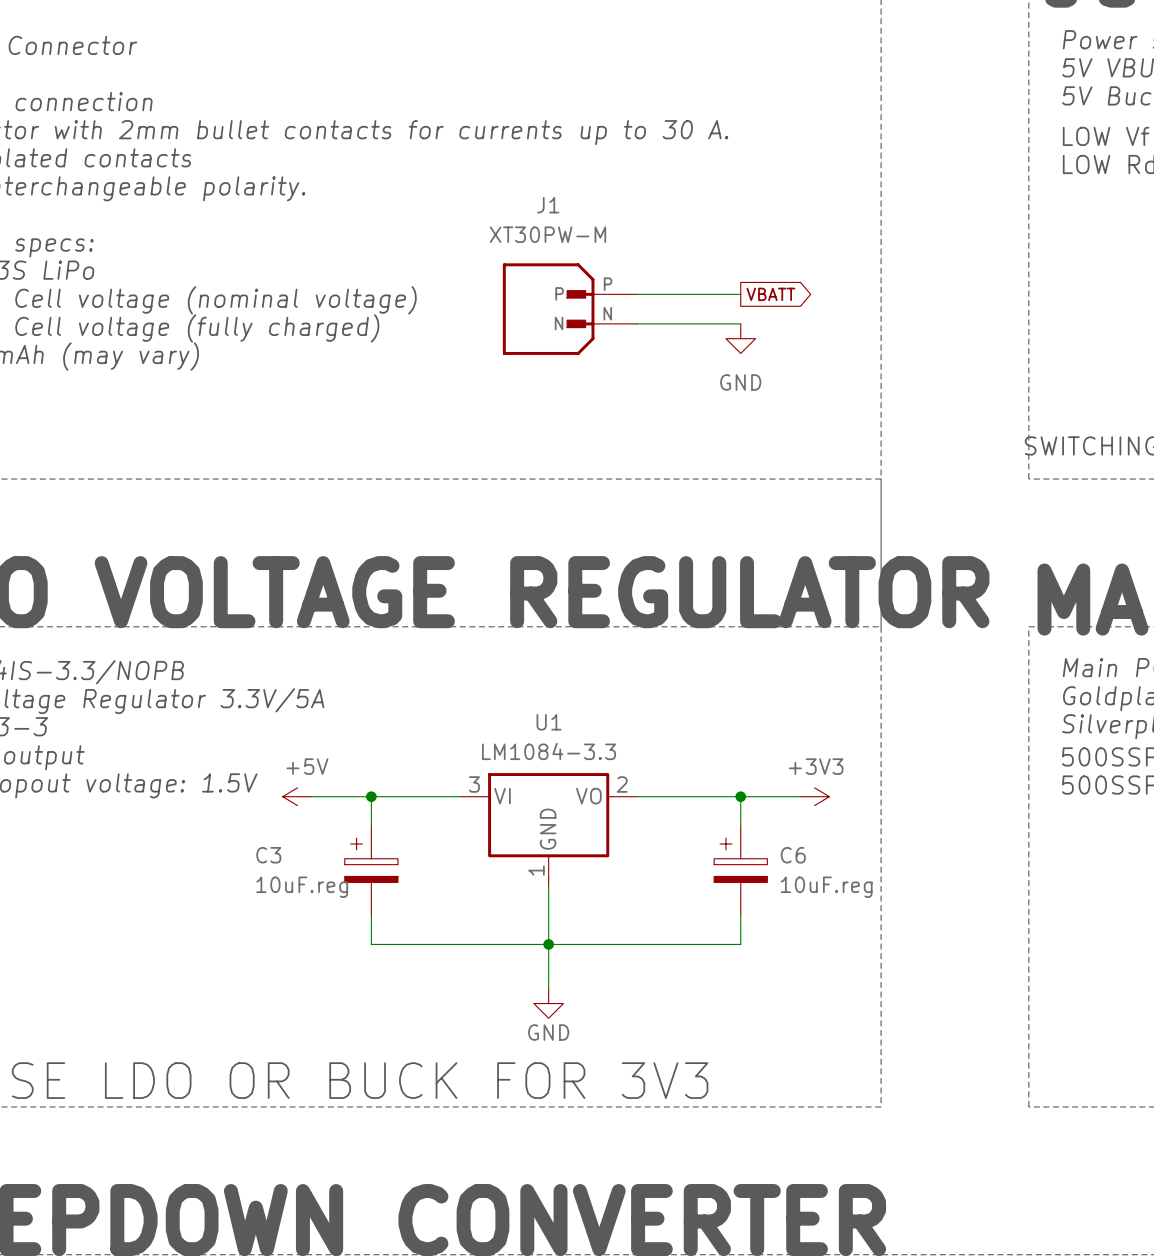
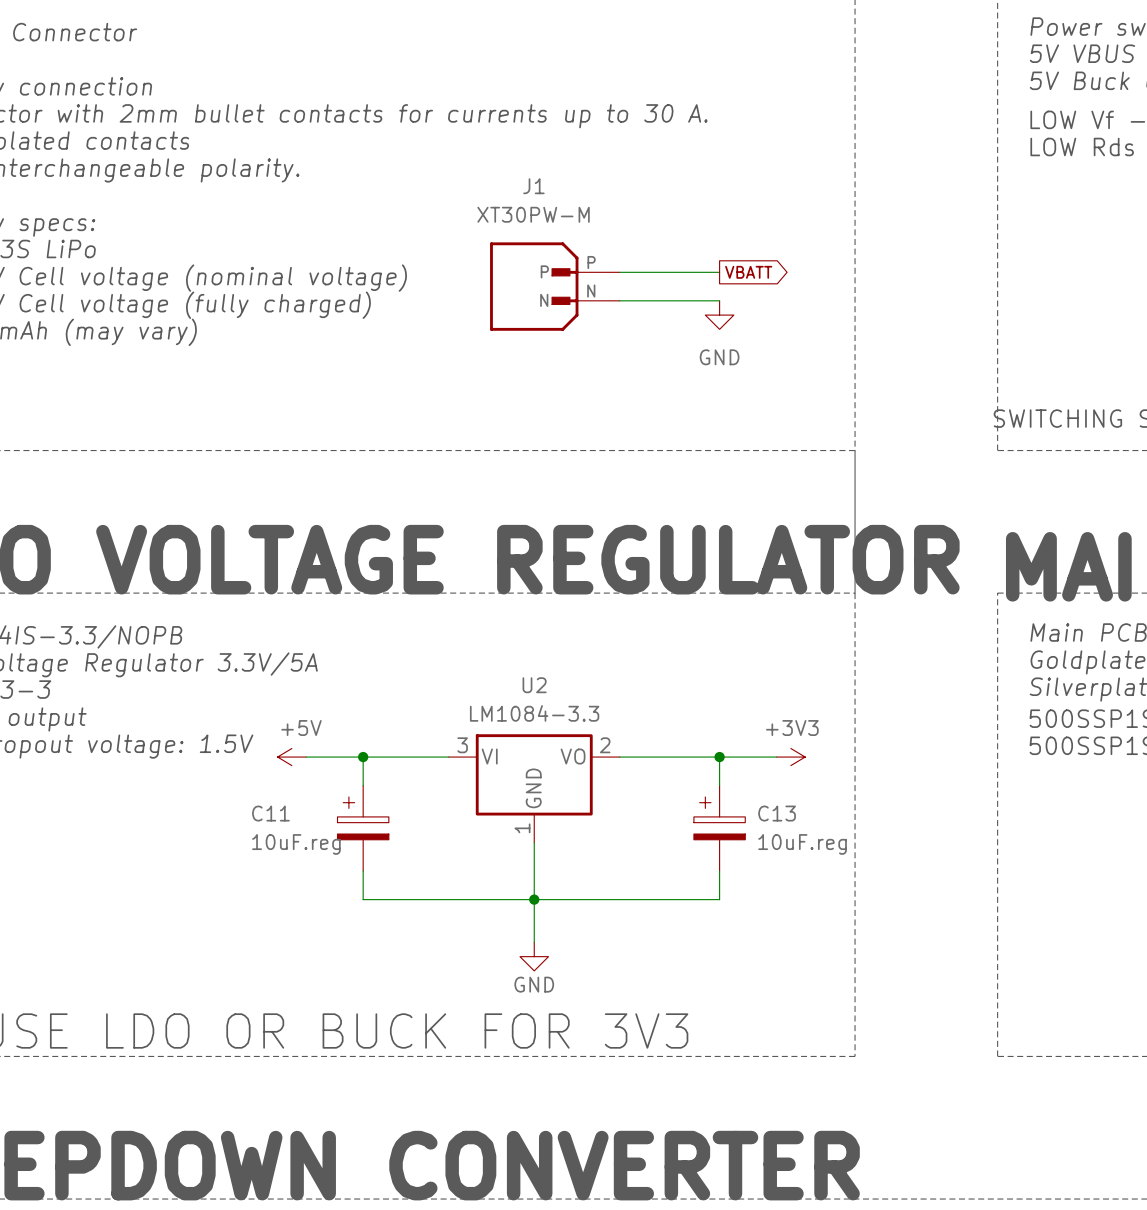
U1 name: U1 (549, 722) -> U2 (534, 685)
C3 name: C3 (268, 855) -> C11 (270, 813)
C6 name: C6 (793, 855) -> C13 (777, 813)

